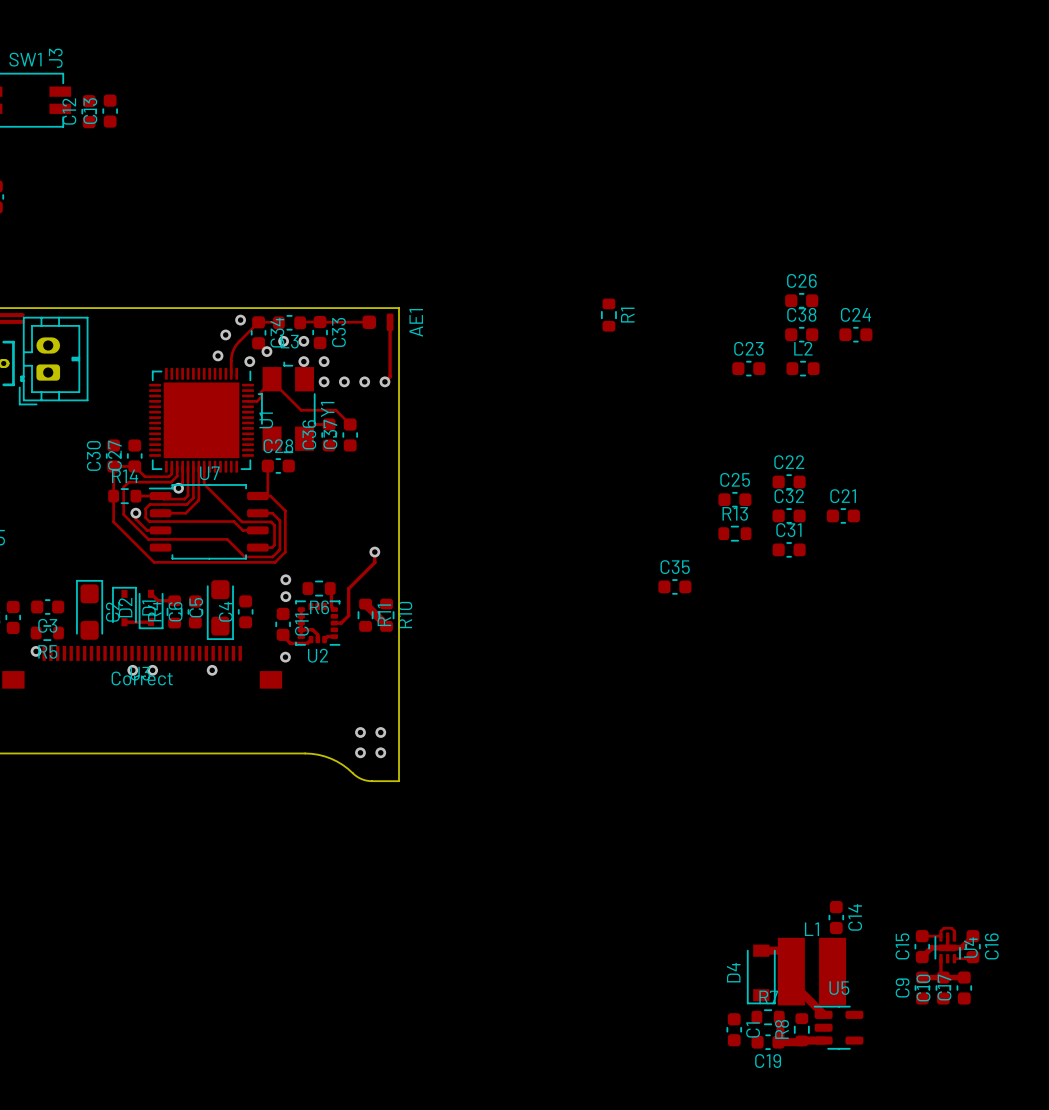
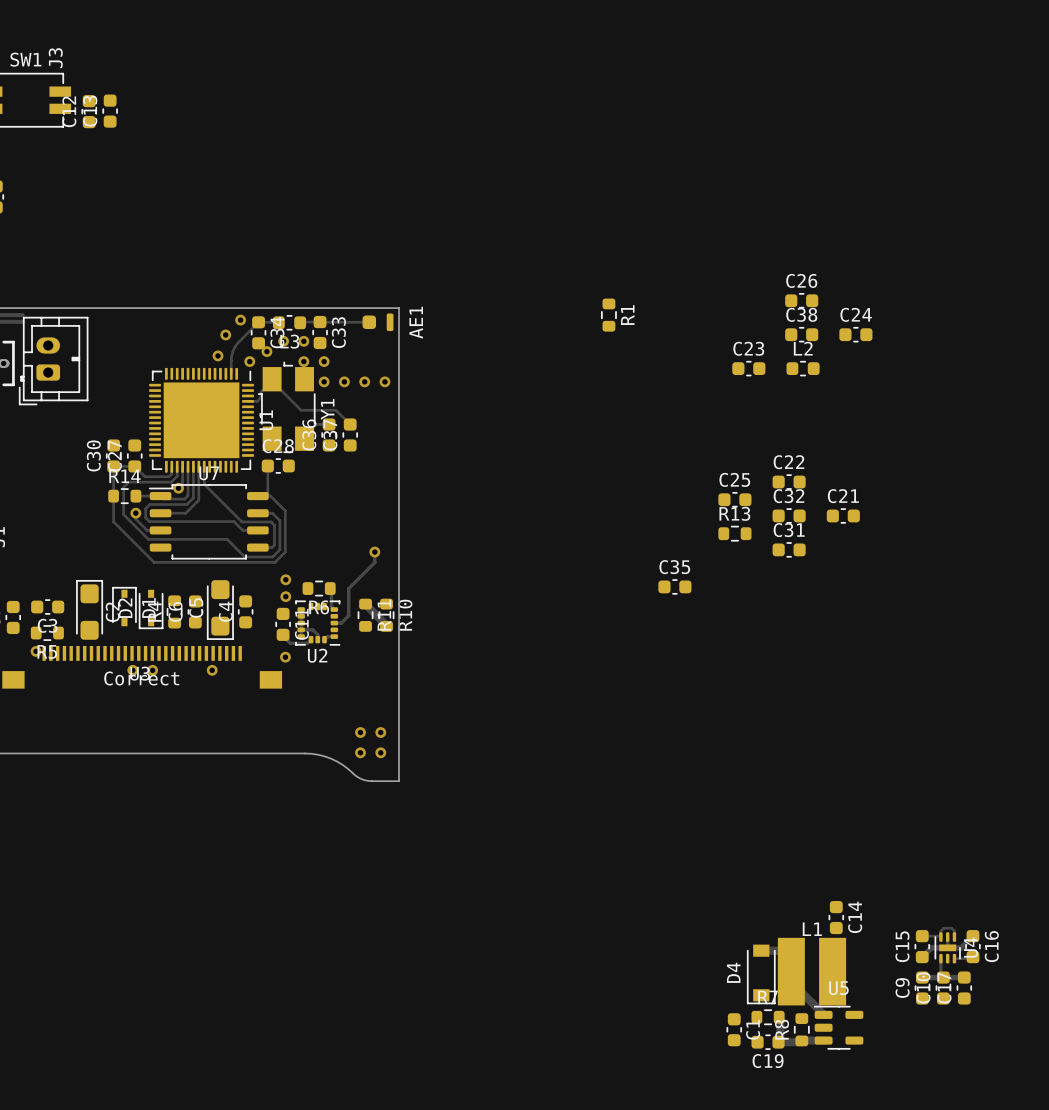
track: (390, 322) (390, 376) (384, 381) -> none
track: (151, 593) (158, 600) (174, 600) -> none
track: (124, 622) (151, 622) -> none

